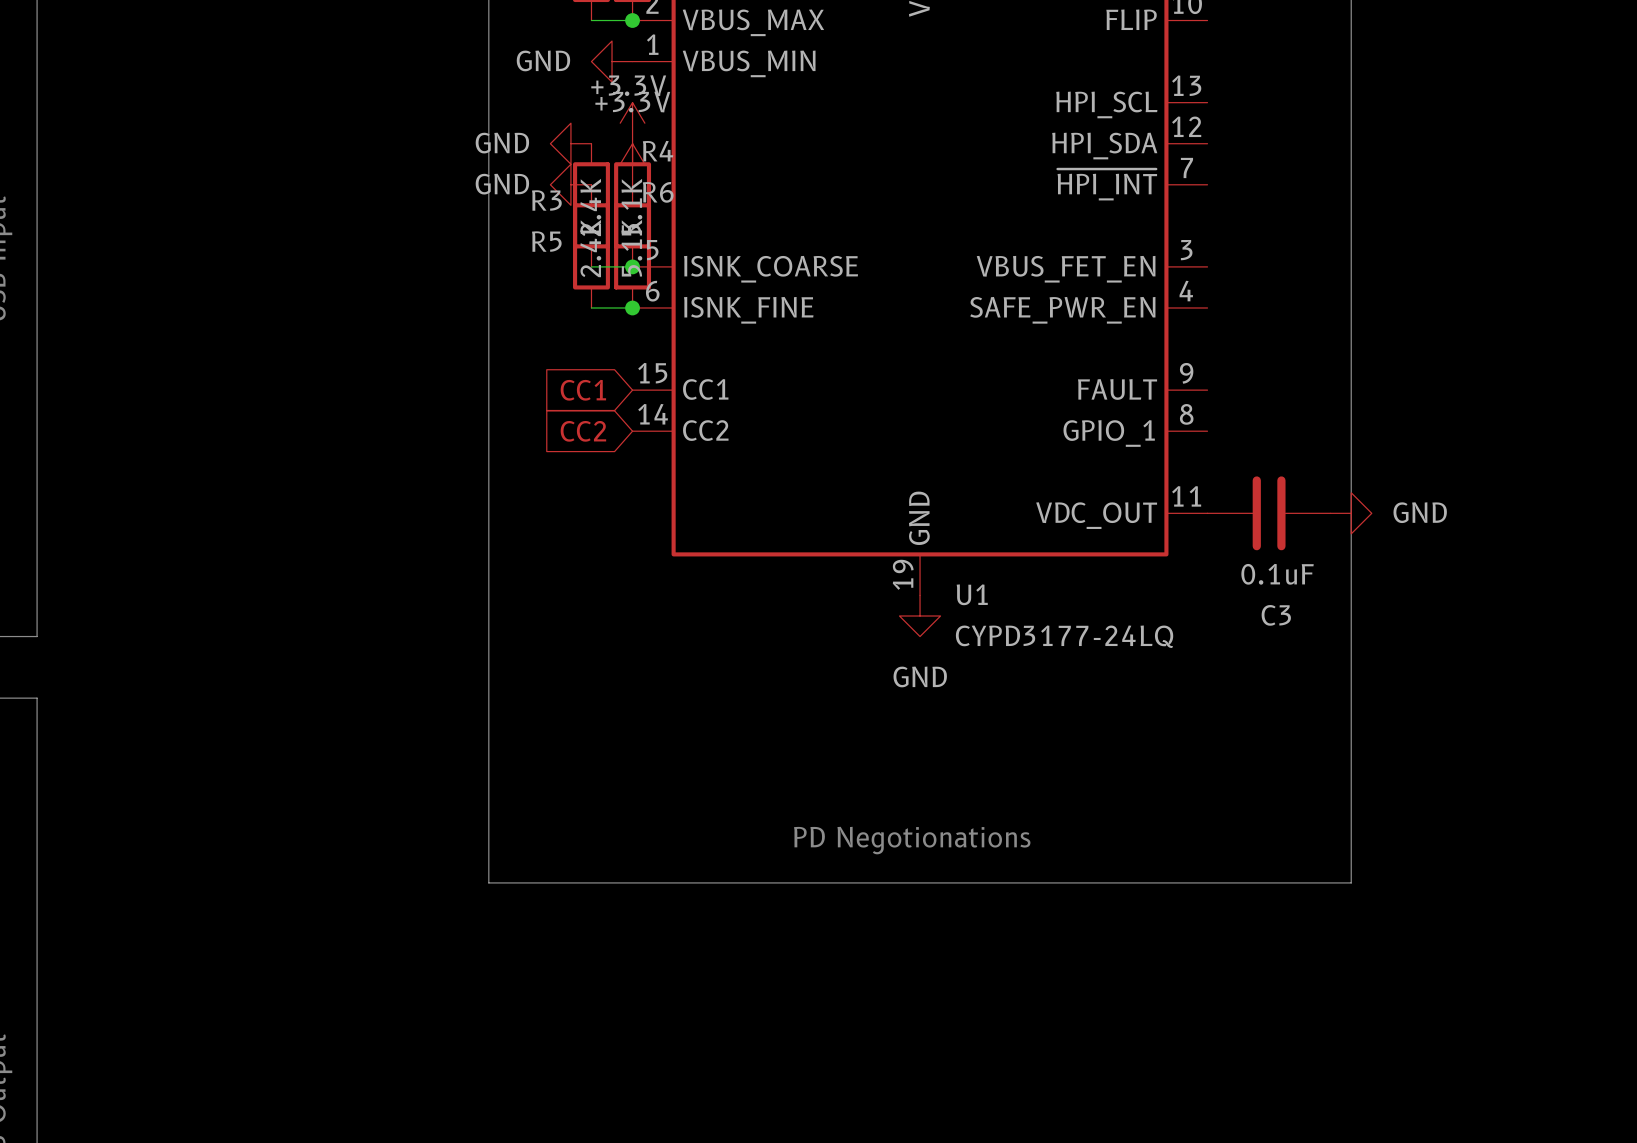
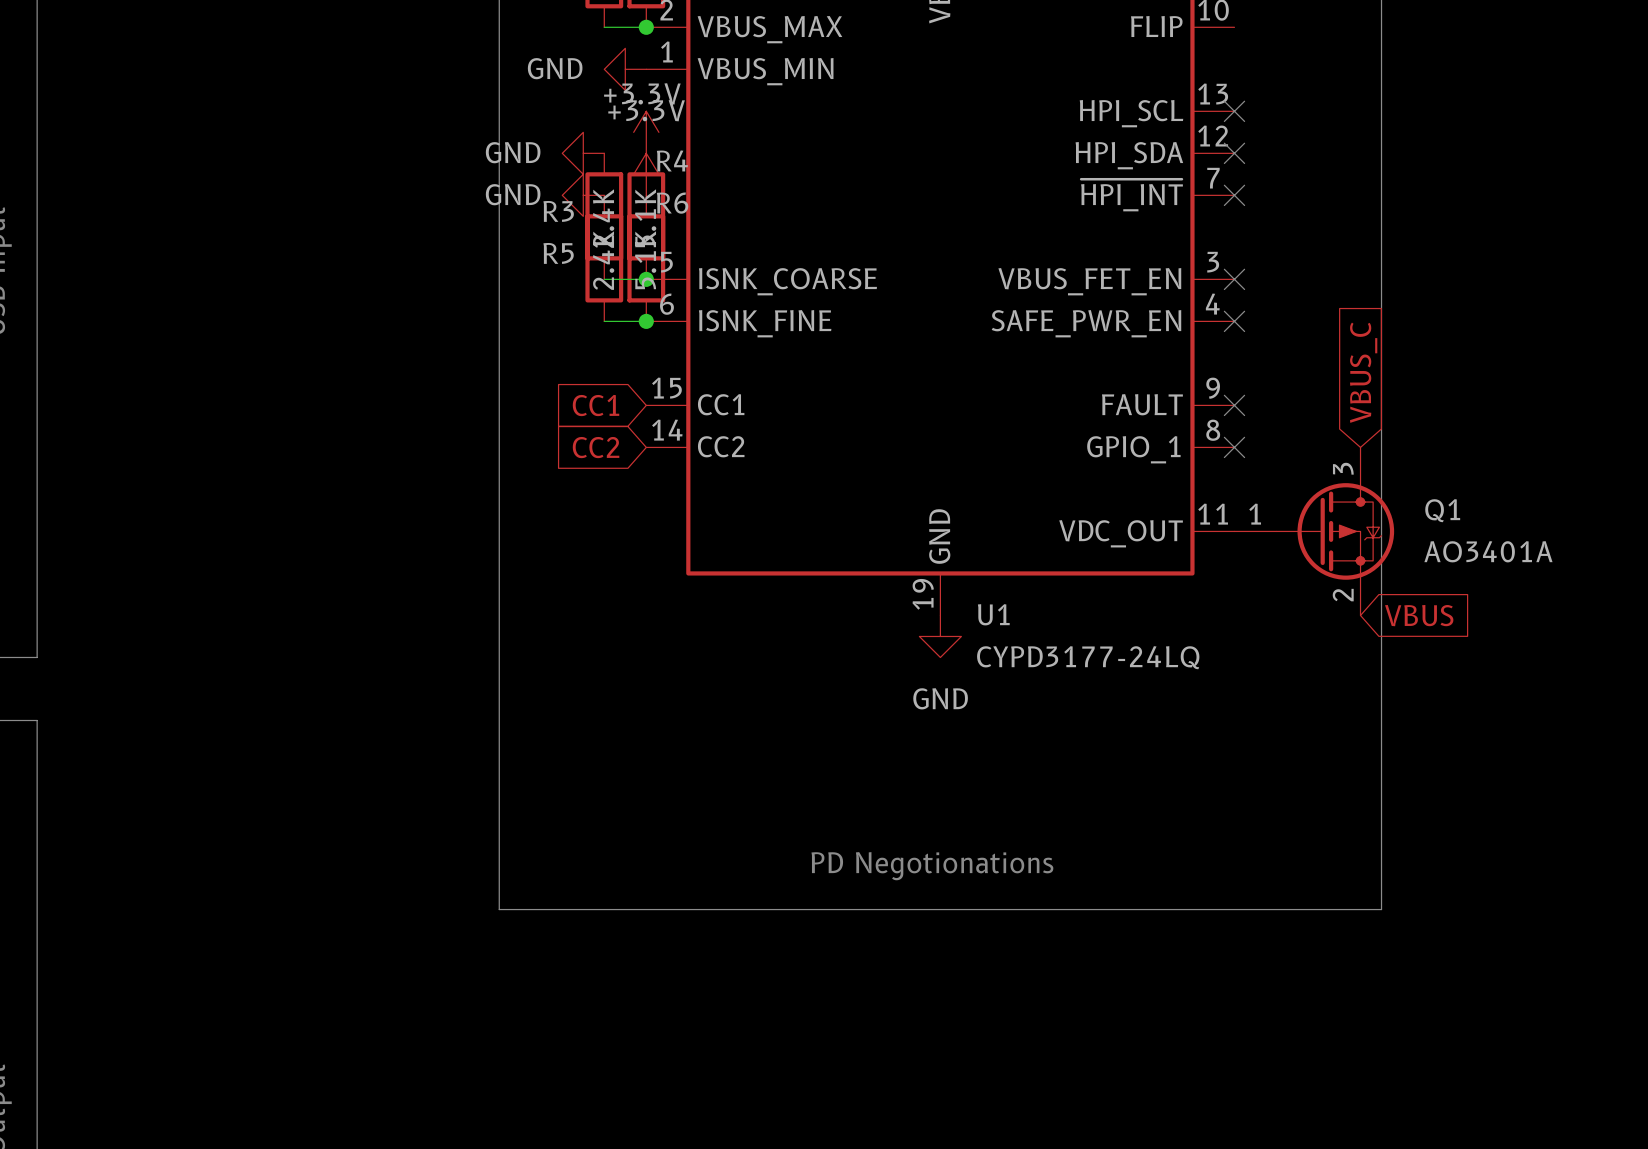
no-connect mark: none -> (1234, 111)
no-connect mark: none -> (1234, 153)
no-connect mark: none -> (1234, 195)
no-connect mark: none -> (1234, 279)
no-connect mark: none -> (1234, 321)
global label: none -> VBUS_C (1363, 372)
no-connect mark: none -> (1234, 405)
no-connect mark: none -> (1234, 447)
C3: 0.1uF (1269, 513) -> none
Q1: none -> AO3401A (1314, 531)
power symbol: GND (1351, 513) -> none
global label: none -> VBUS (1419, 615)

